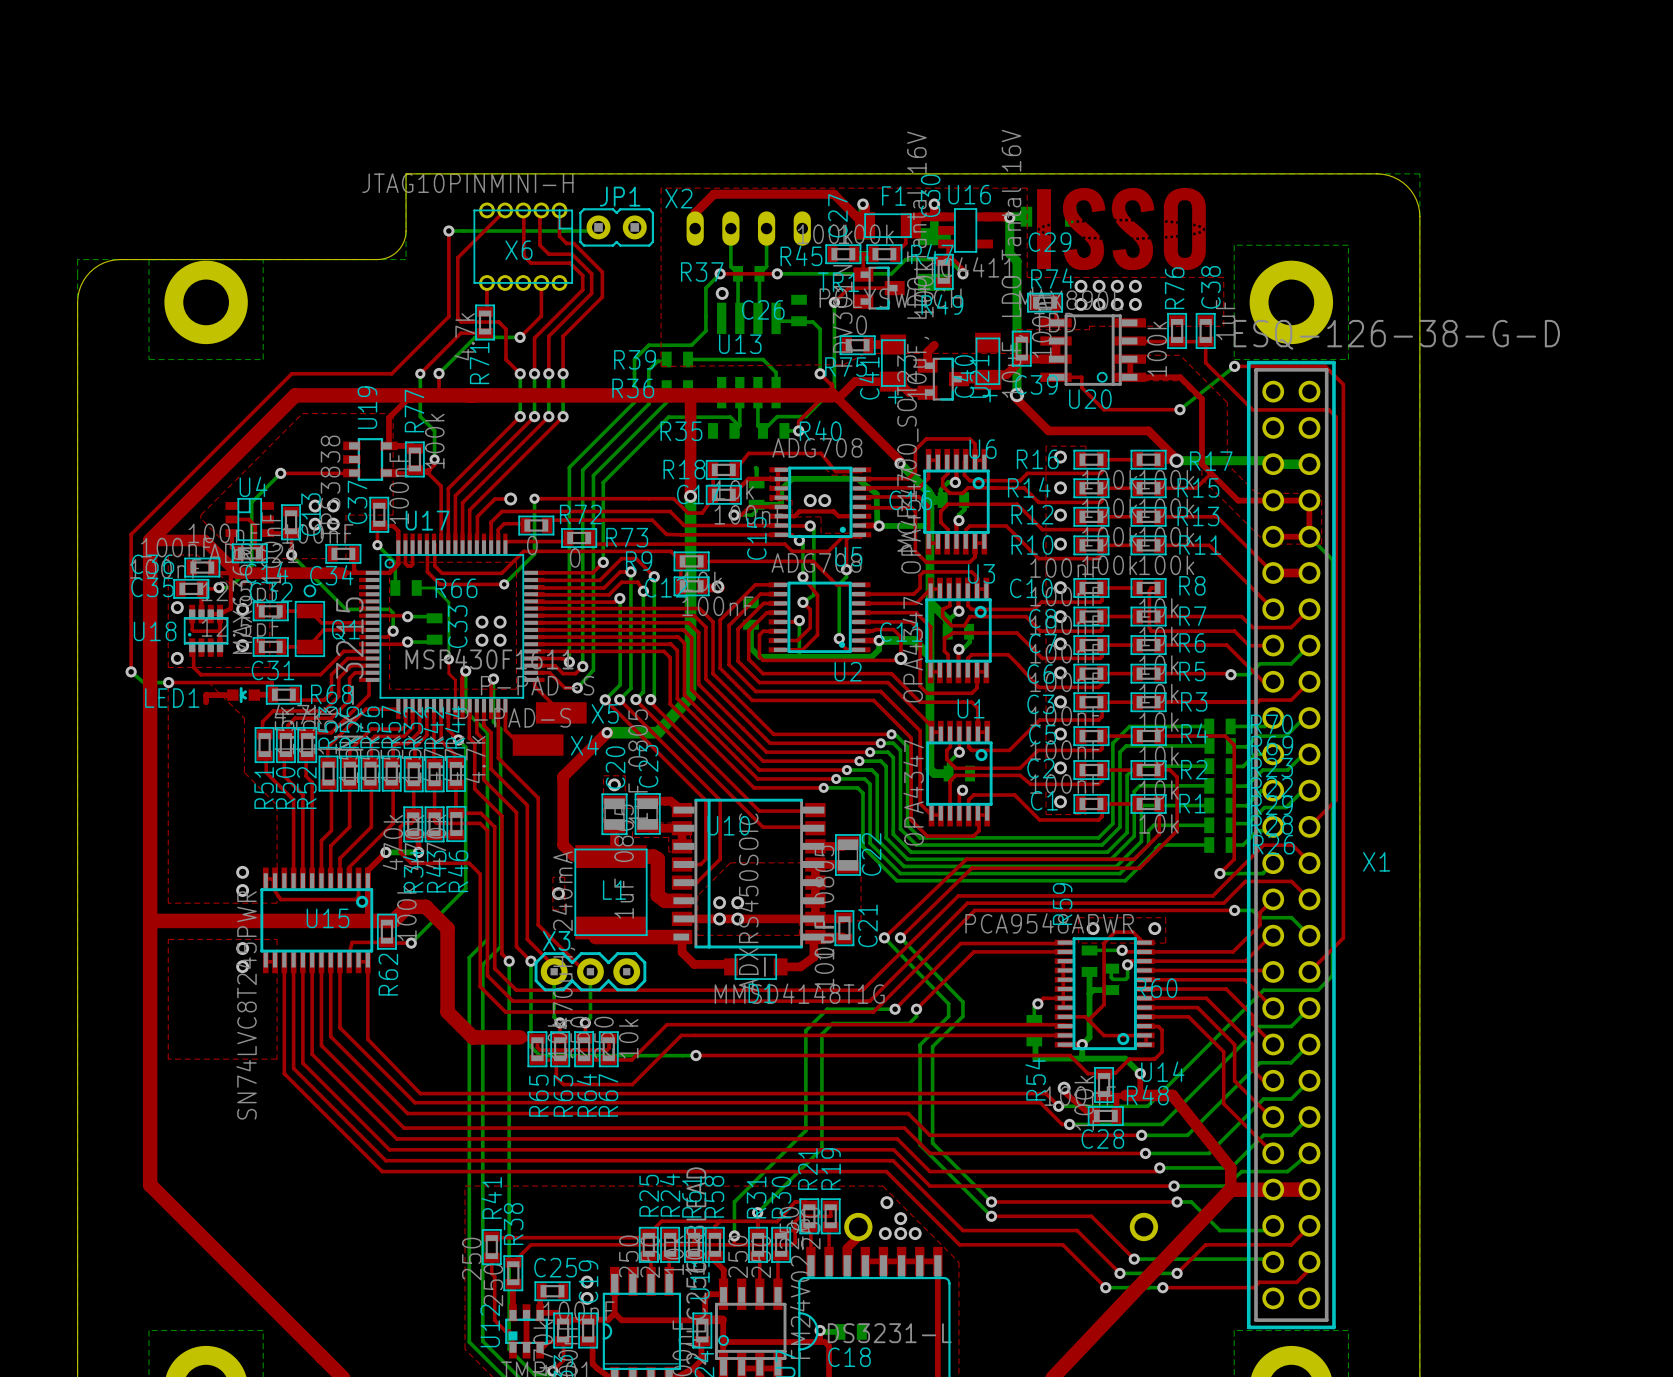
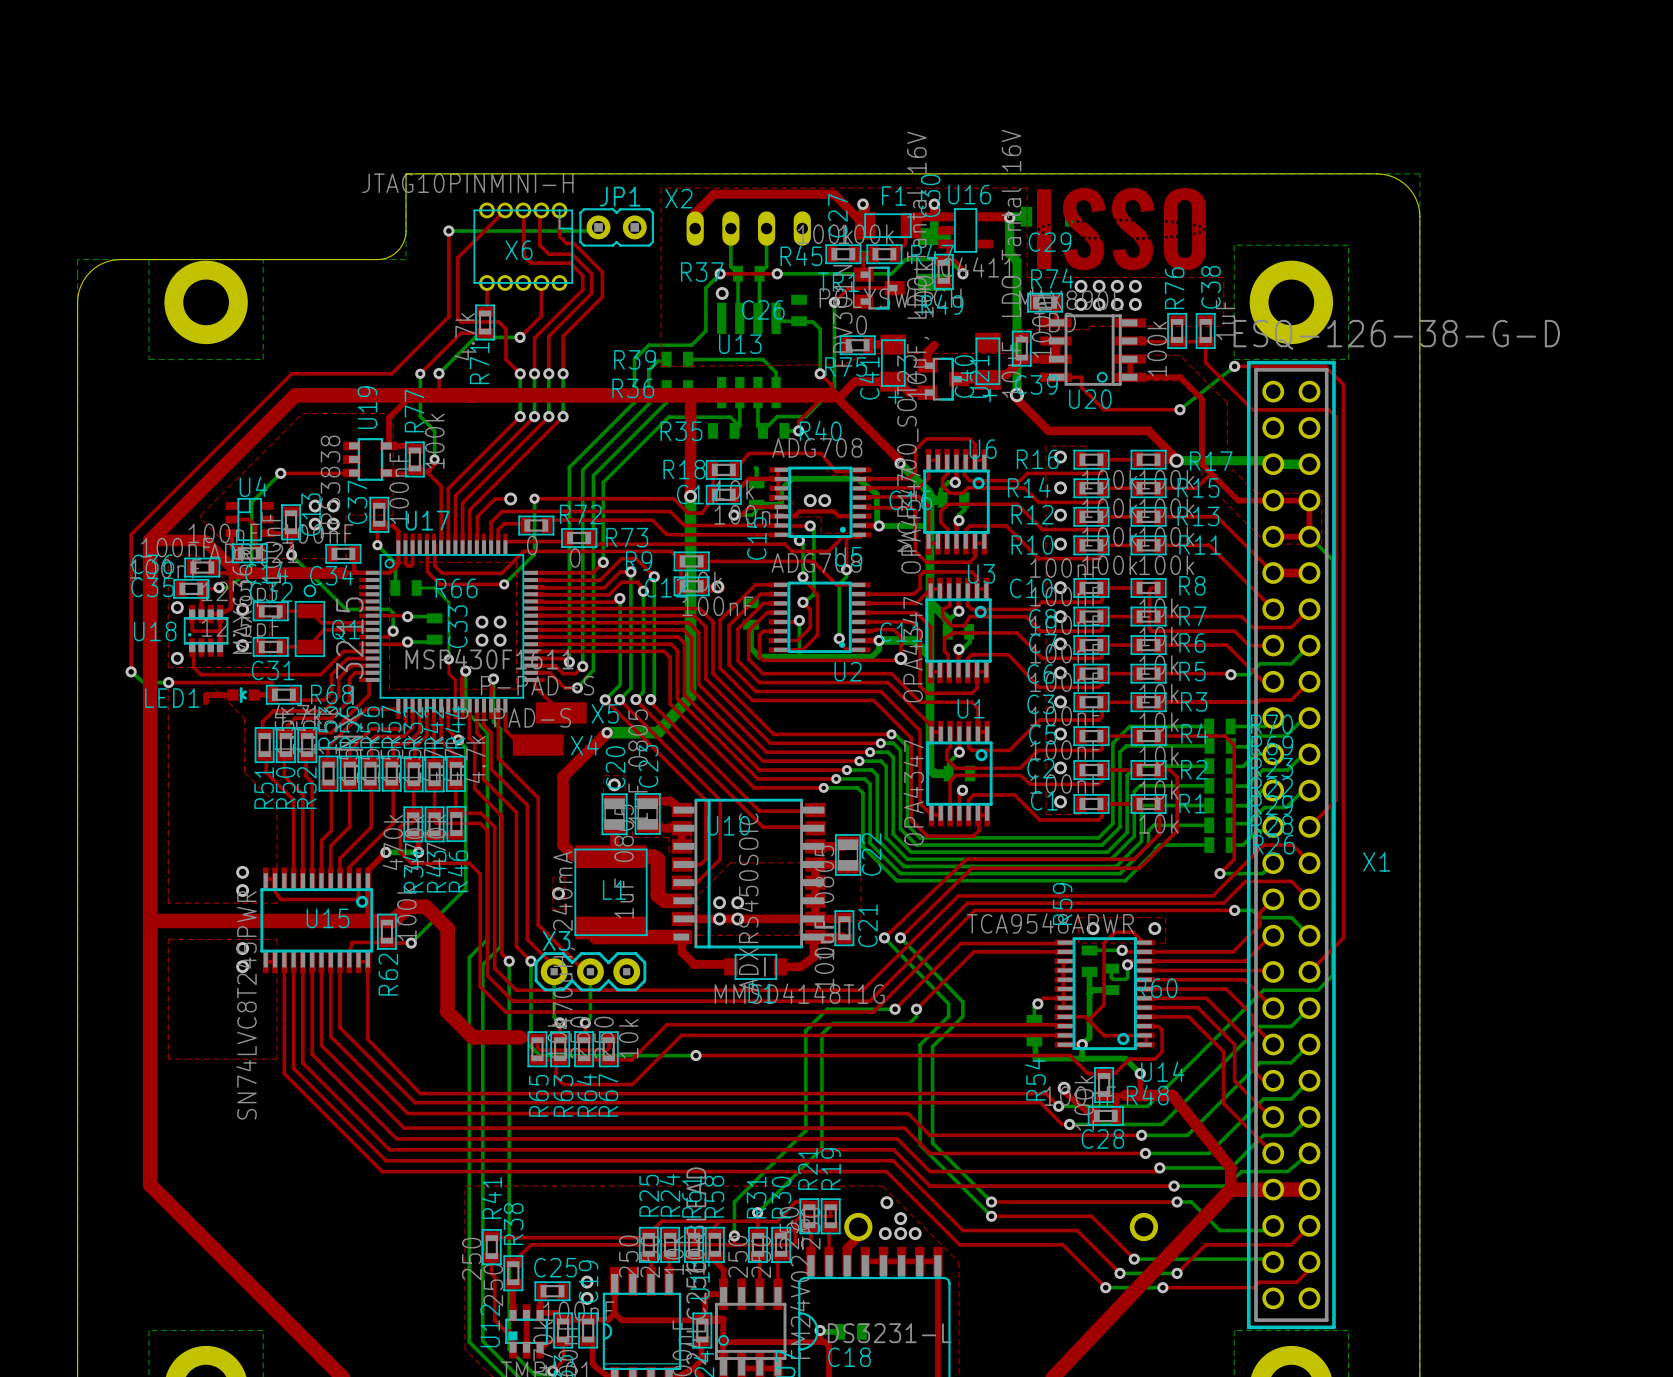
U14 value: PCA9548APWR (1049, 923) -> TCA9548APWR (1050, 923)

